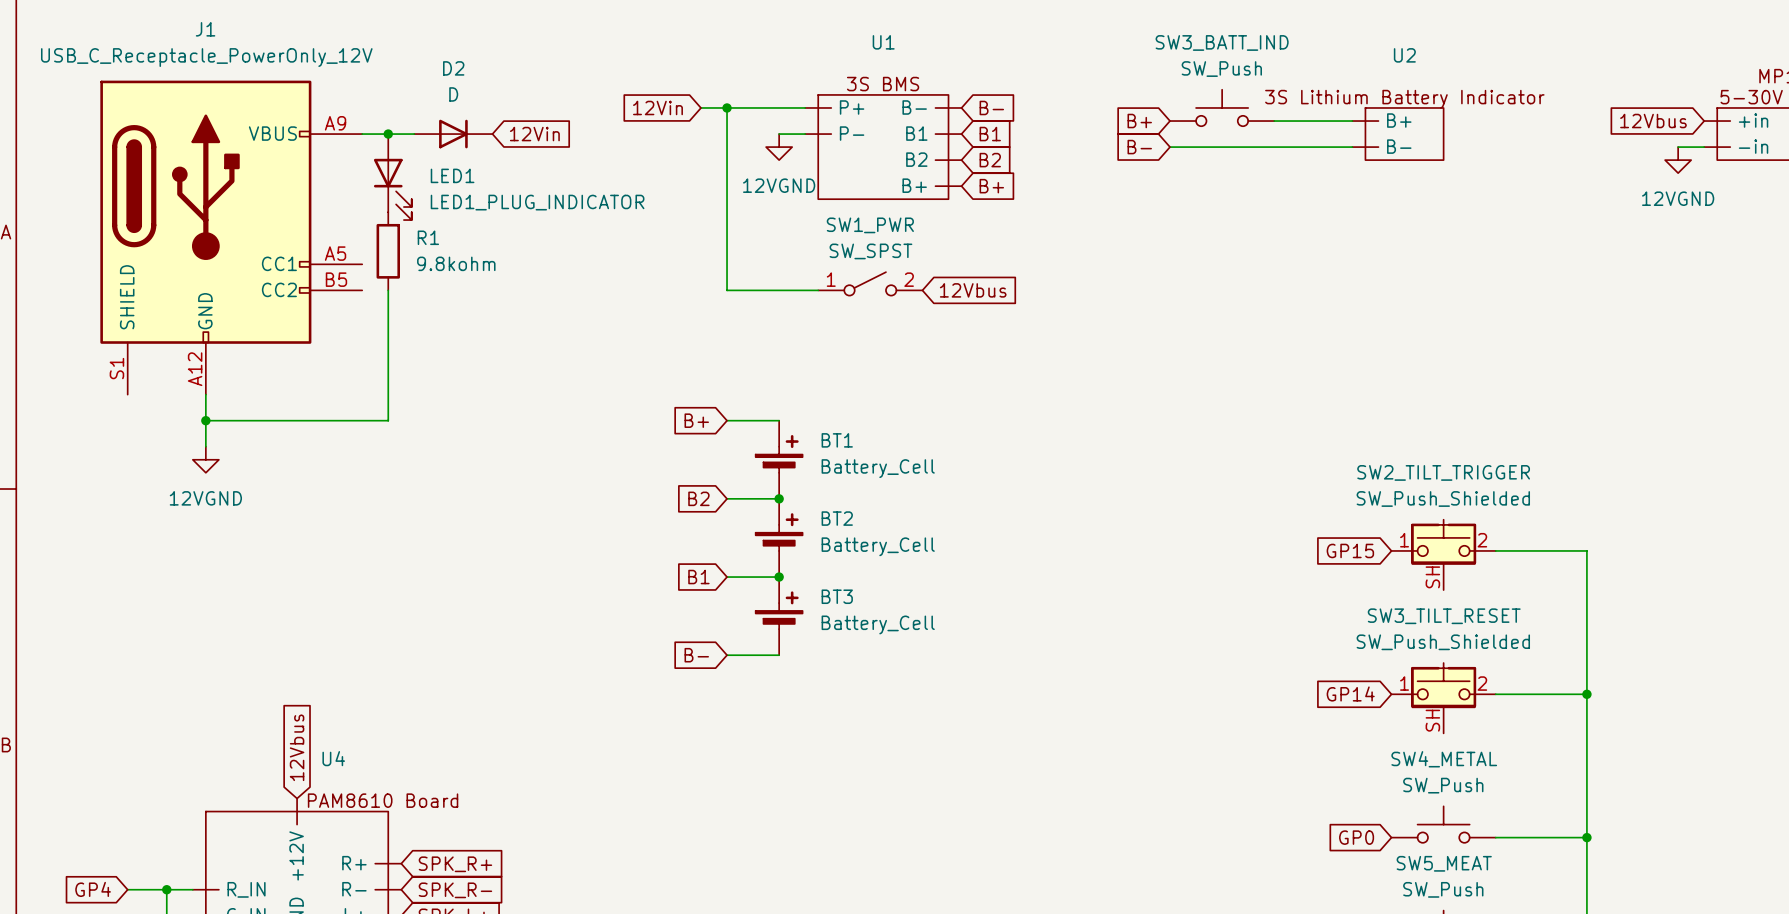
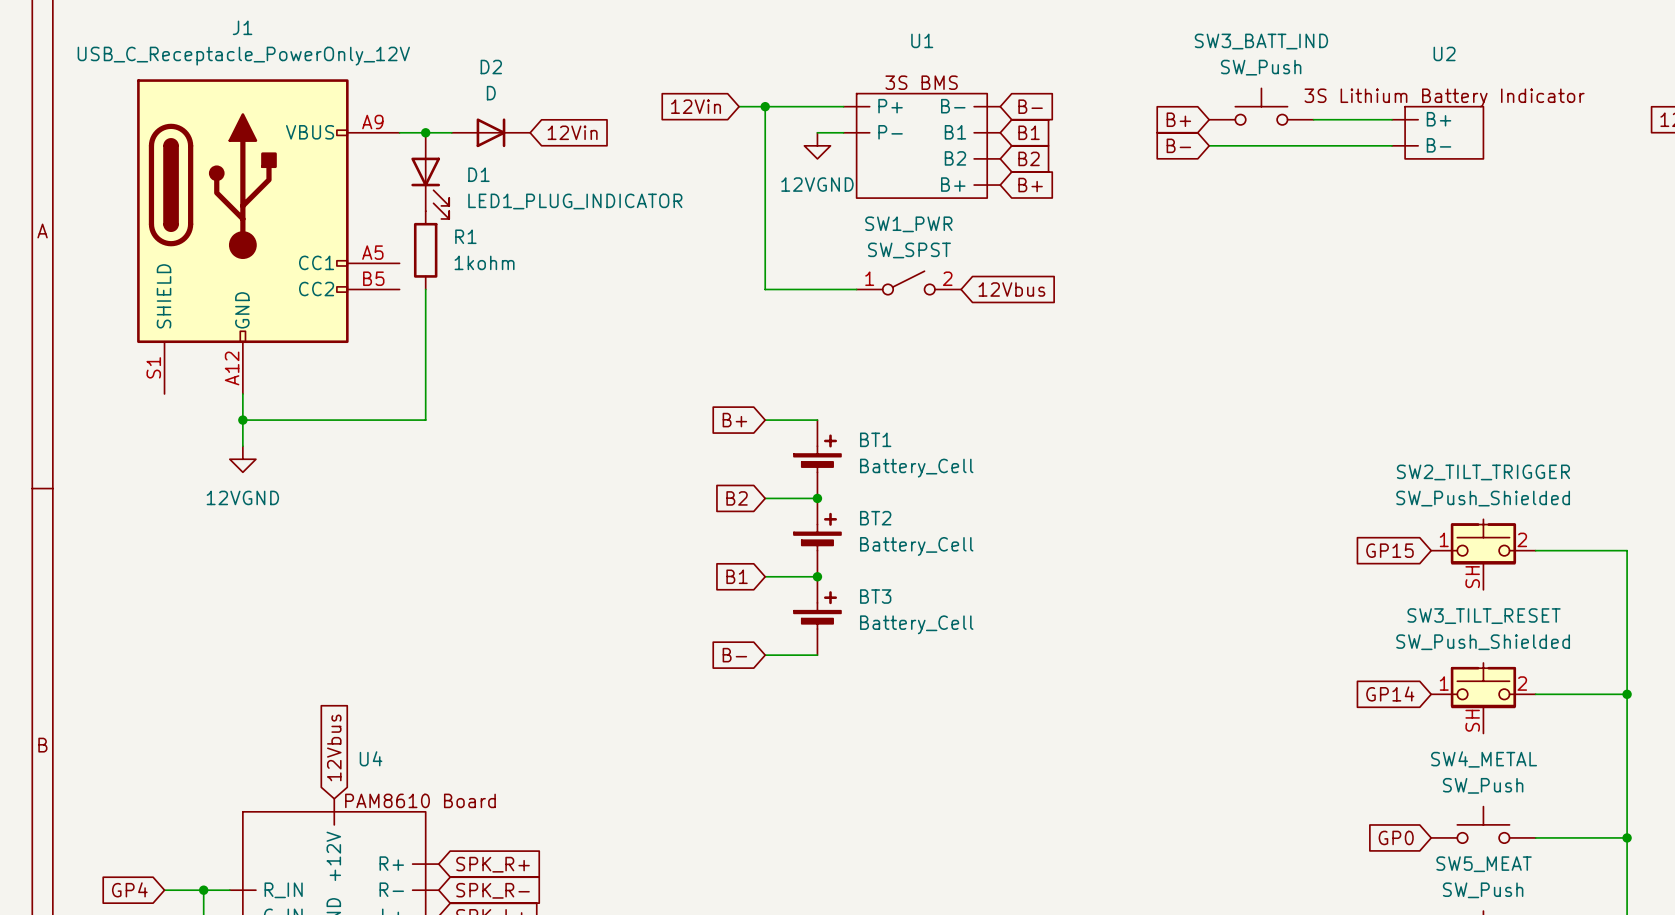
LED1 name: LED1 (452, 175) -> D1 (478, 174)
R1 value: 9.8kohm (456, 263) -> 1kohm (484, 262)

